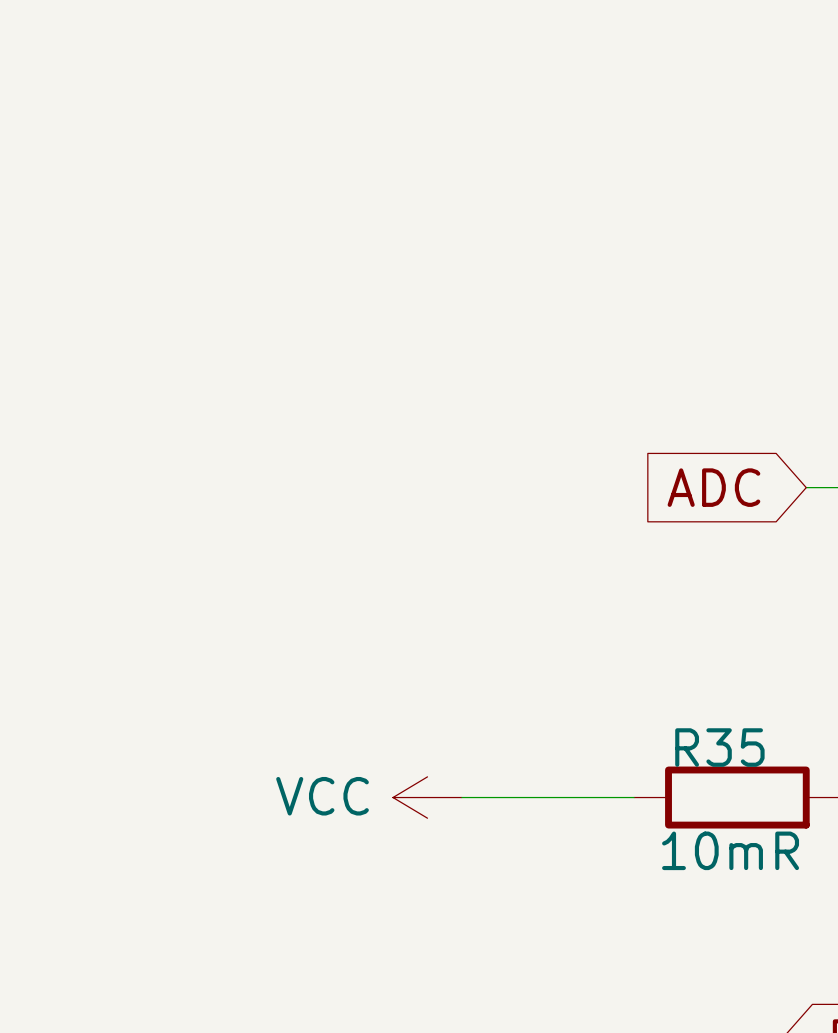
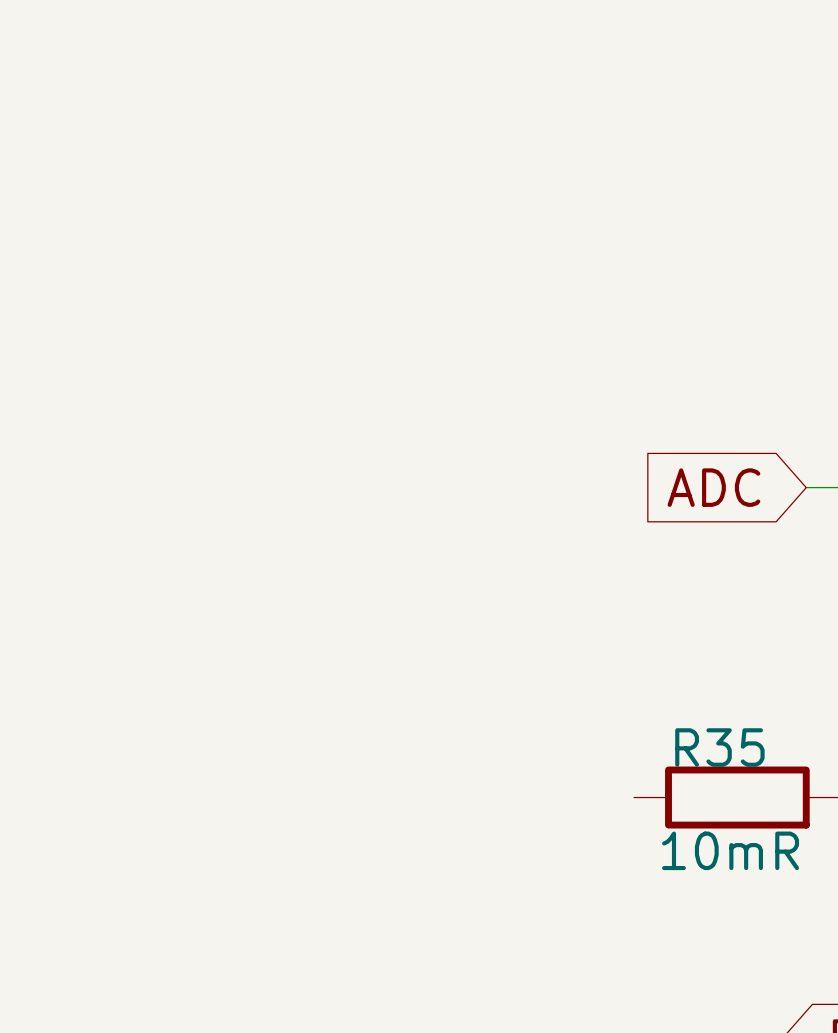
power symbol: VCC (427, 797) -> none
wire: (461, 797) (634, 797) -> none

